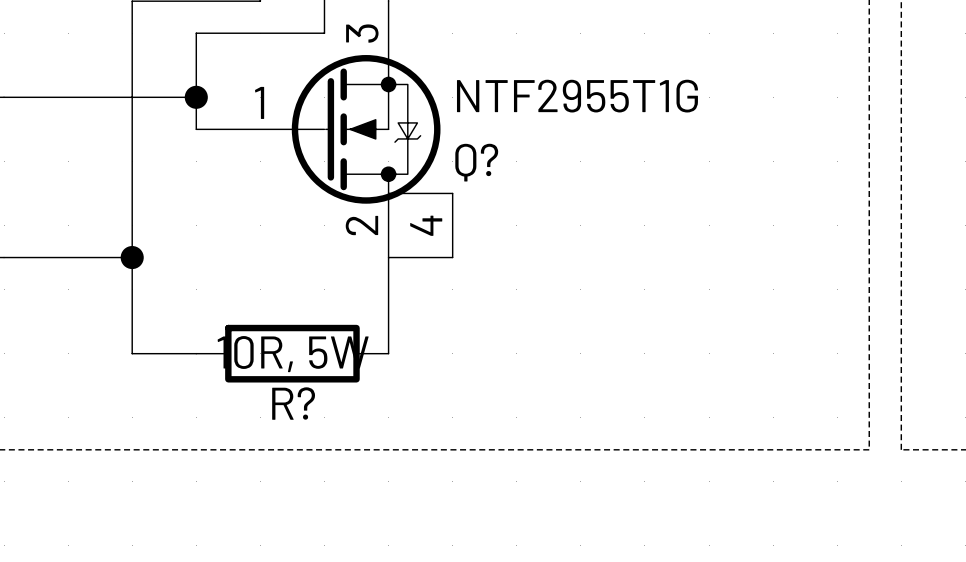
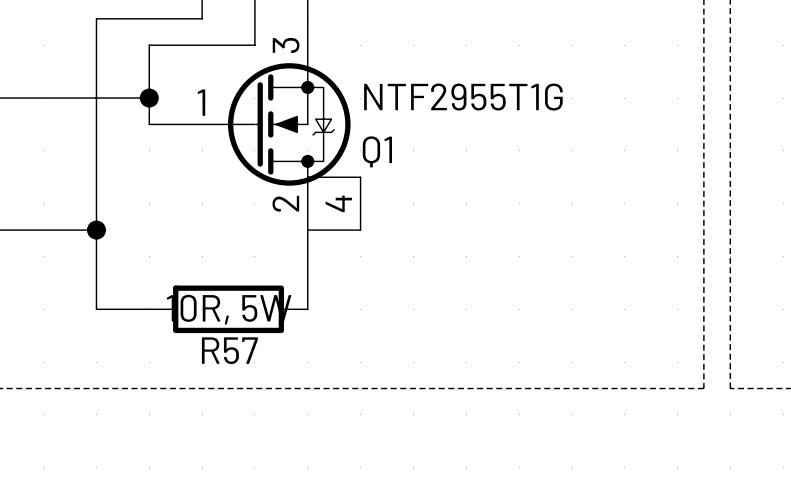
Q? name: Q? (476, 162) -> Q1 (377, 151)
R? name: R? (293, 403) -> R57 (229, 350)

